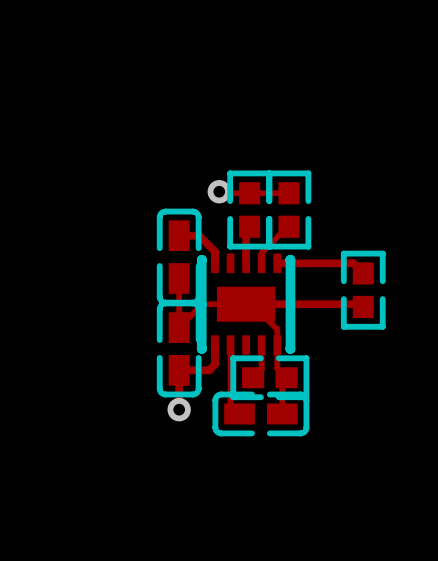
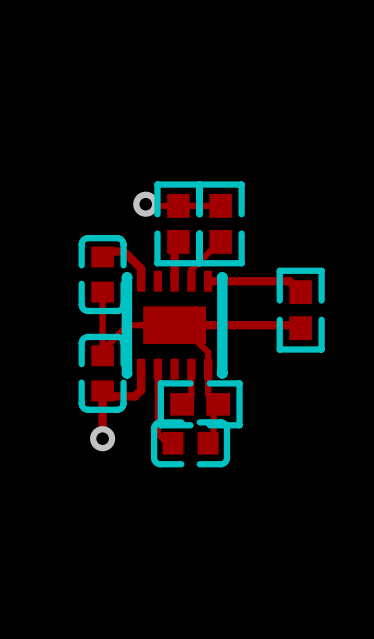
part footprint: [156, 208, 202, 306] -> [78, 234, 127, 315]
part footprint: [156, 300, 202, 398] -> [78, 333, 127, 413]
part footprint: [212, 391, 310, 437] -> [150, 419, 231, 468]

